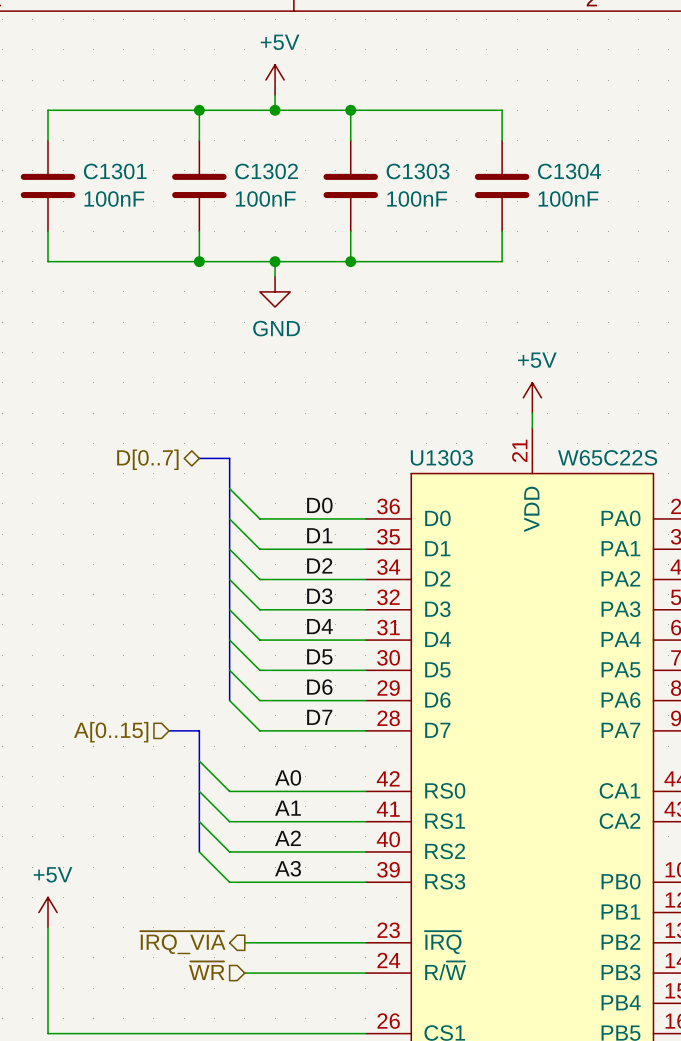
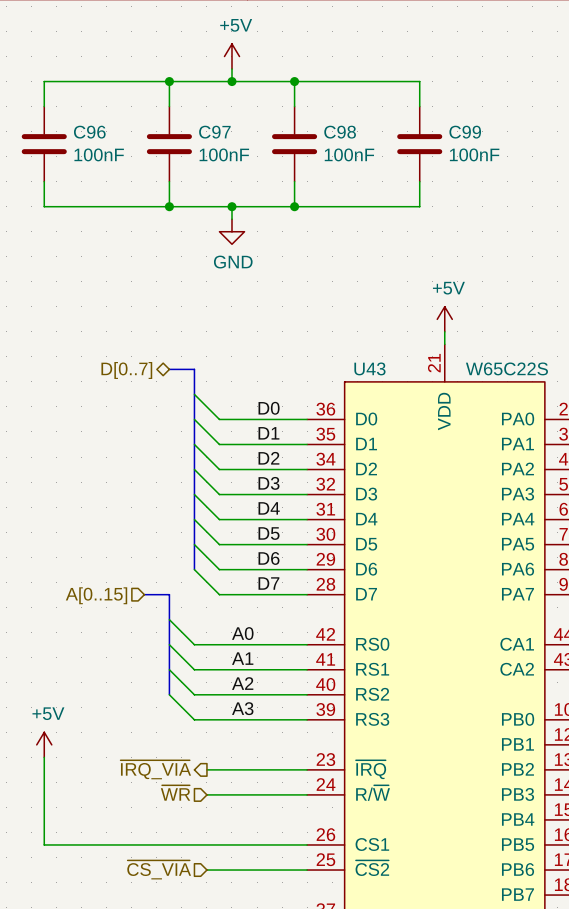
C1301 name: C1301 (115, 171) -> C96 (89, 132)
C1302 name: C1302 (266, 171) -> C97 (214, 132)
C1303 name: C1303 (418, 171) -> C98 (340, 132)
C1304 name: C1304 (569, 171) -> C99 (465, 132)
U1303 name: U1303 (441, 457) -> U43 (369, 368)

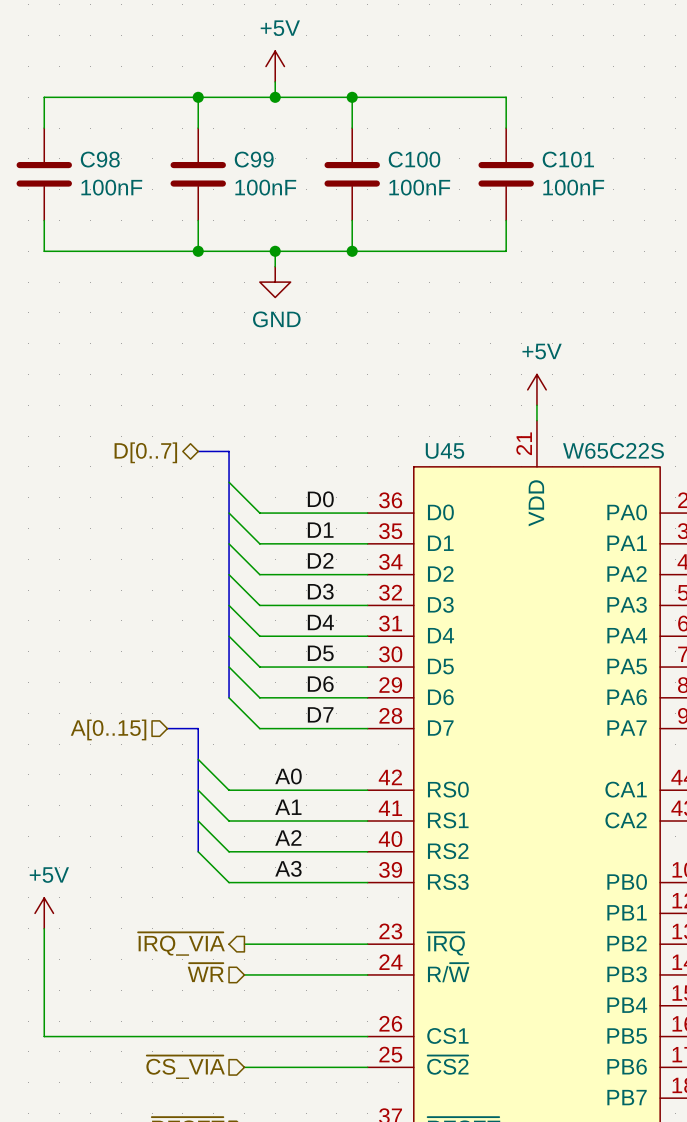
C96 name: C96 (89, 132) -> C98 (100, 159)
C97 name: C97 (214, 132) -> C99 (254, 159)
C98 name: C98 (340, 132) -> C100 (414, 159)
C99 name: C99 (465, 132) -> C101 (568, 159)
U43 name: U43 (369, 368) -> U45 (444, 451)

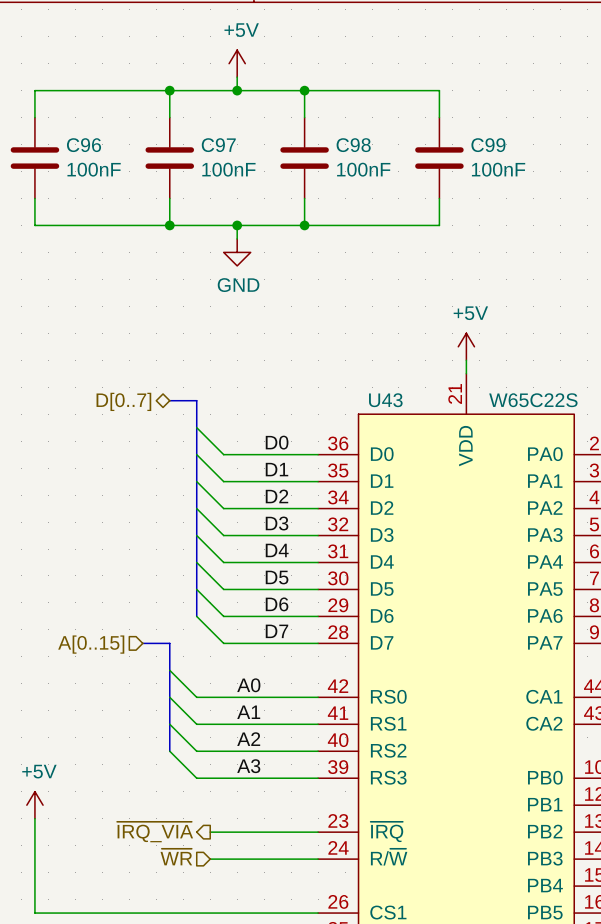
C98 name: C98 (100, 159) -> C96 (84, 145)
C99 name: C99 (254, 159) -> C97 (218, 145)
C100 name: C100 (414, 159) -> C98 (353, 145)
C101 name: C101 (568, 159) -> C99 (488, 145)
U45 name: U45 (444, 451) -> U43 (385, 400)

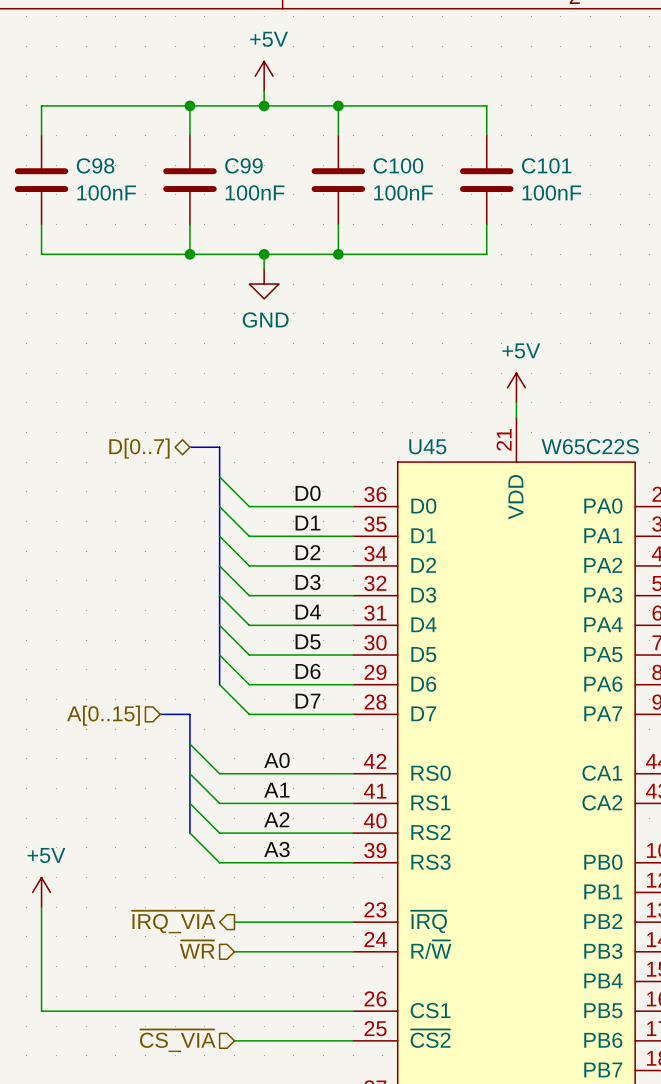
C96 name: C96 (84, 145) -> C98 (95, 165)
C97 name: C97 (218, 145) -> C99 (243, 165)
C98 name: C98 (353, 145) -> C100 (398, 165)
C99 name: C99 (488, 145) -> C101 (546, 165)
U43 name: U43 (385, 400) -> U45 (427, 446)

